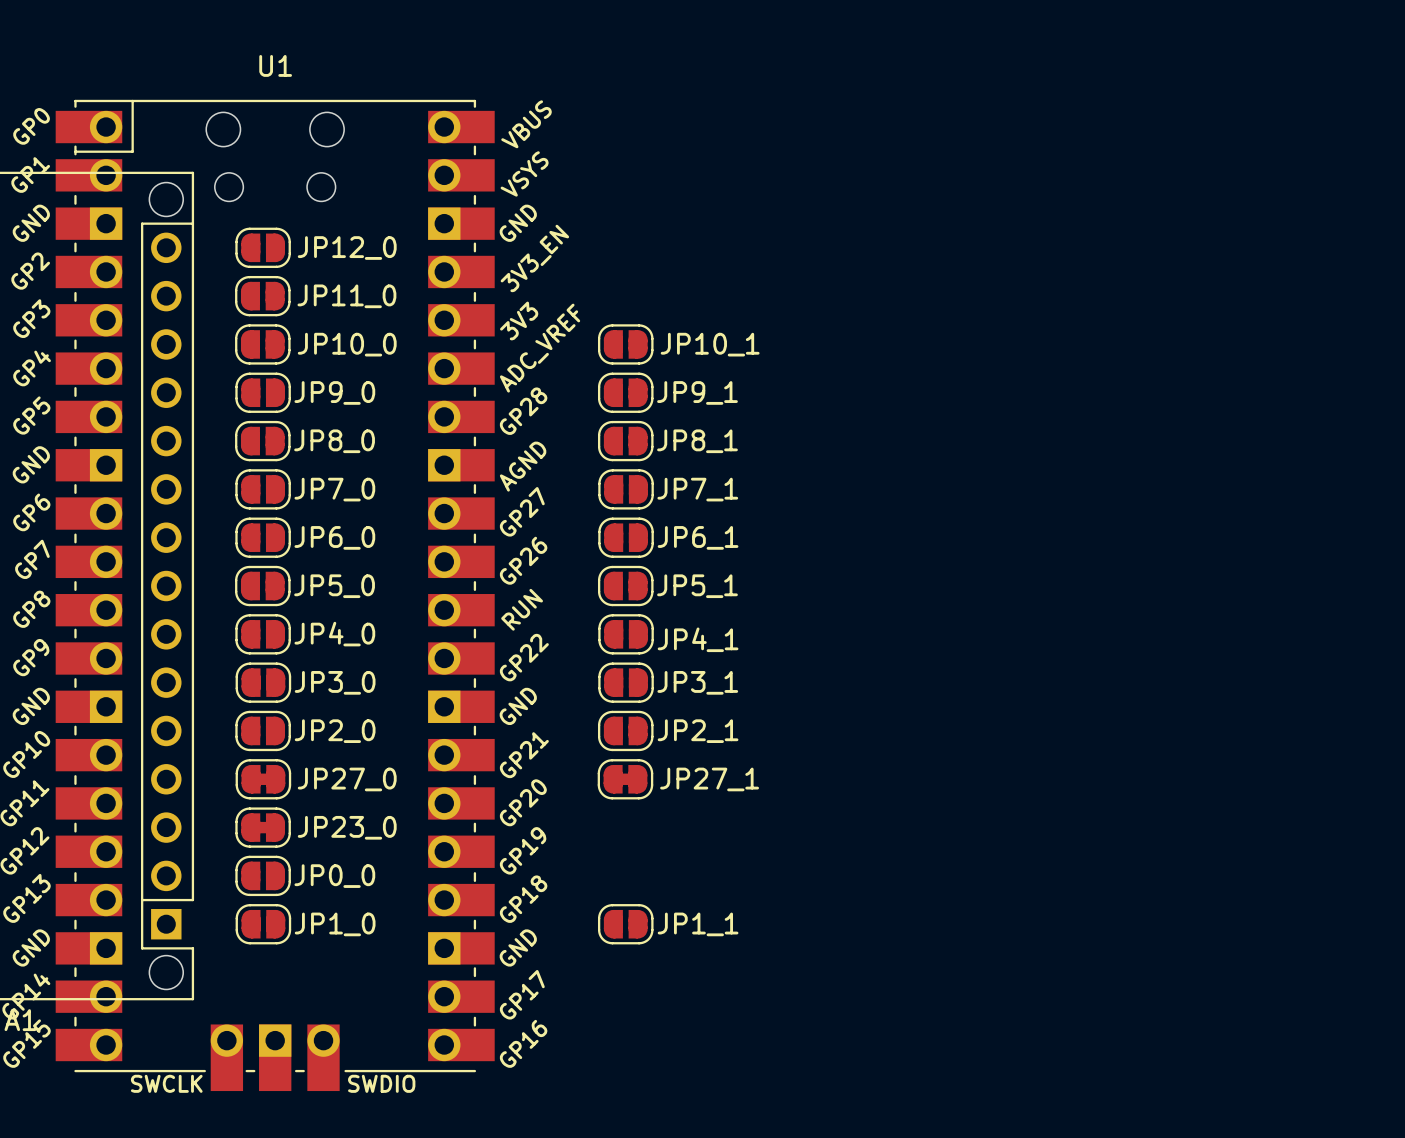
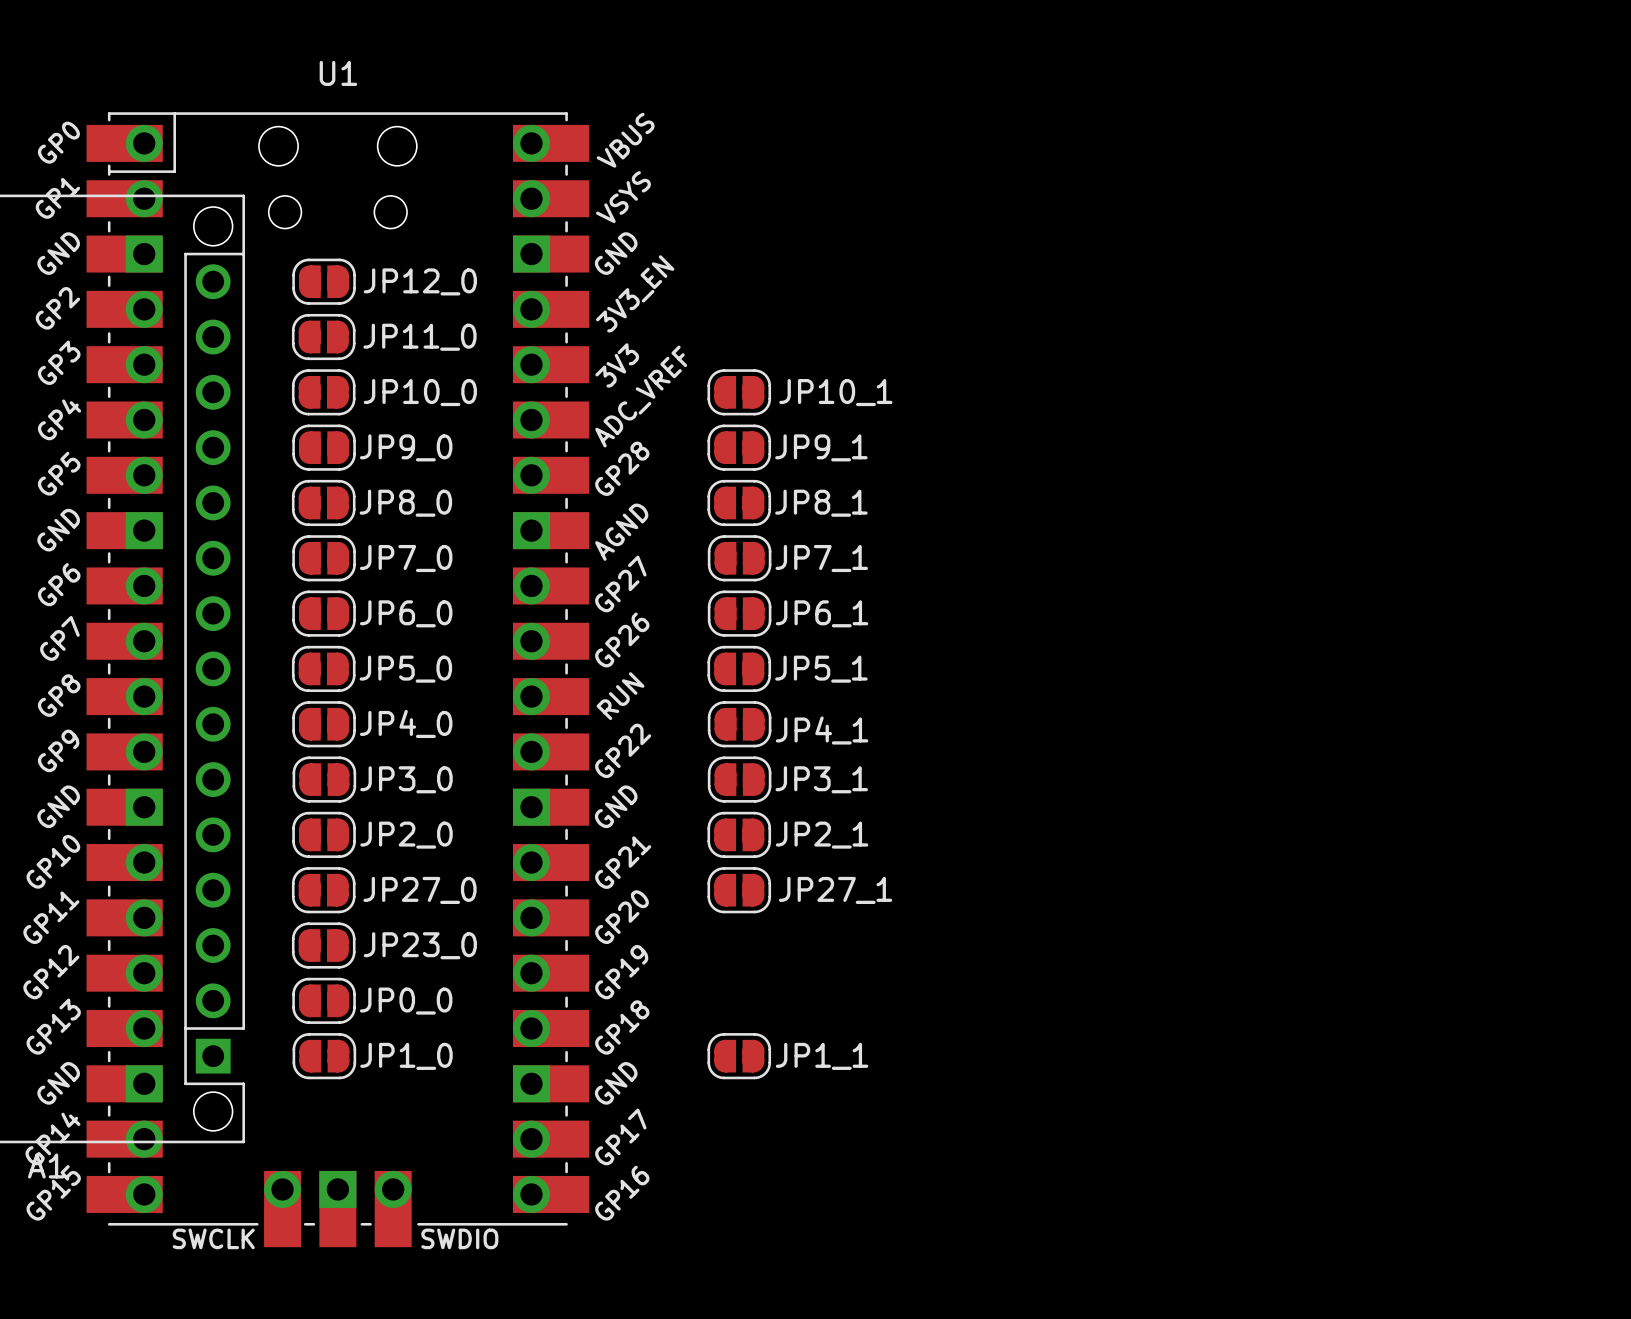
JP27_0 footprint: [235, 759, 292, 800] -> [291, 867, 356, 914]
JP27_1 footprint: [597, 759, 654, 800] -> [707, 867, 772, 914]
JP23_0 footprint: [235, 807, 291, 848] -> [291, 922, 356, 969]

